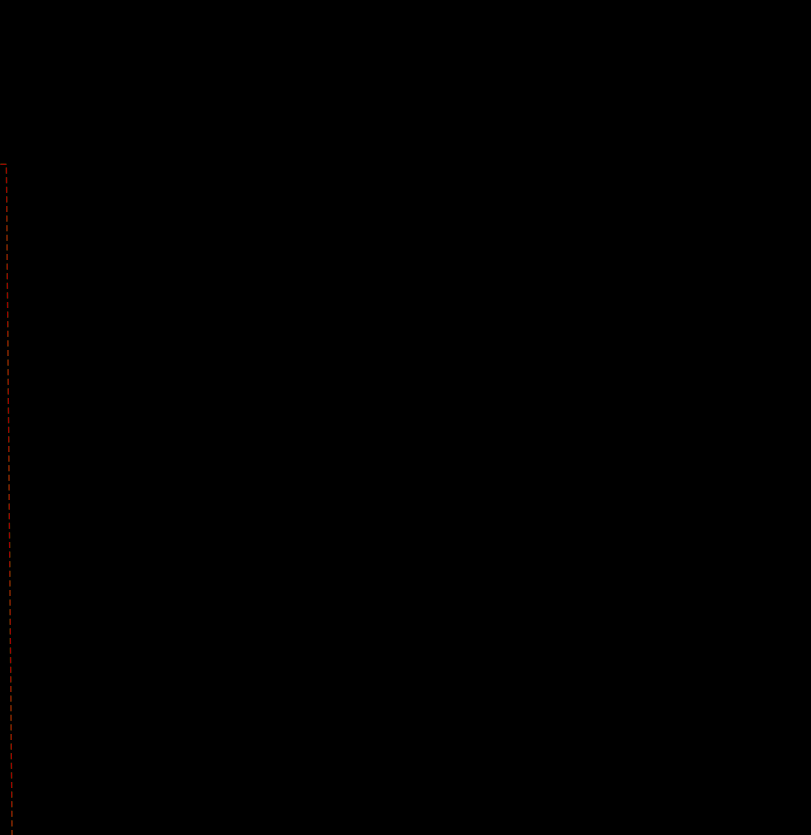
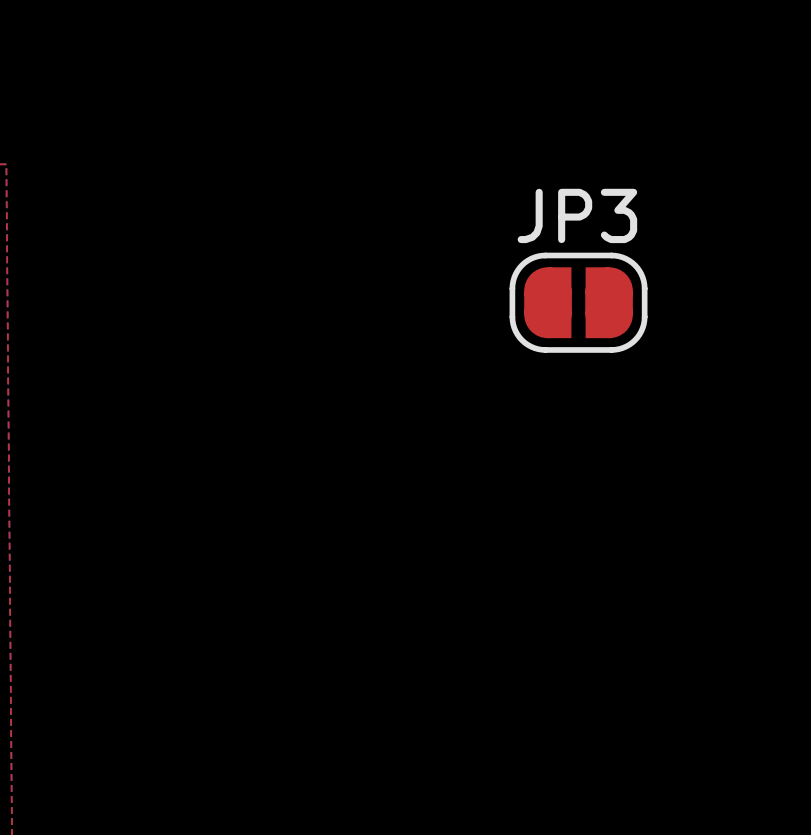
JP3: none -> (578, 302)

